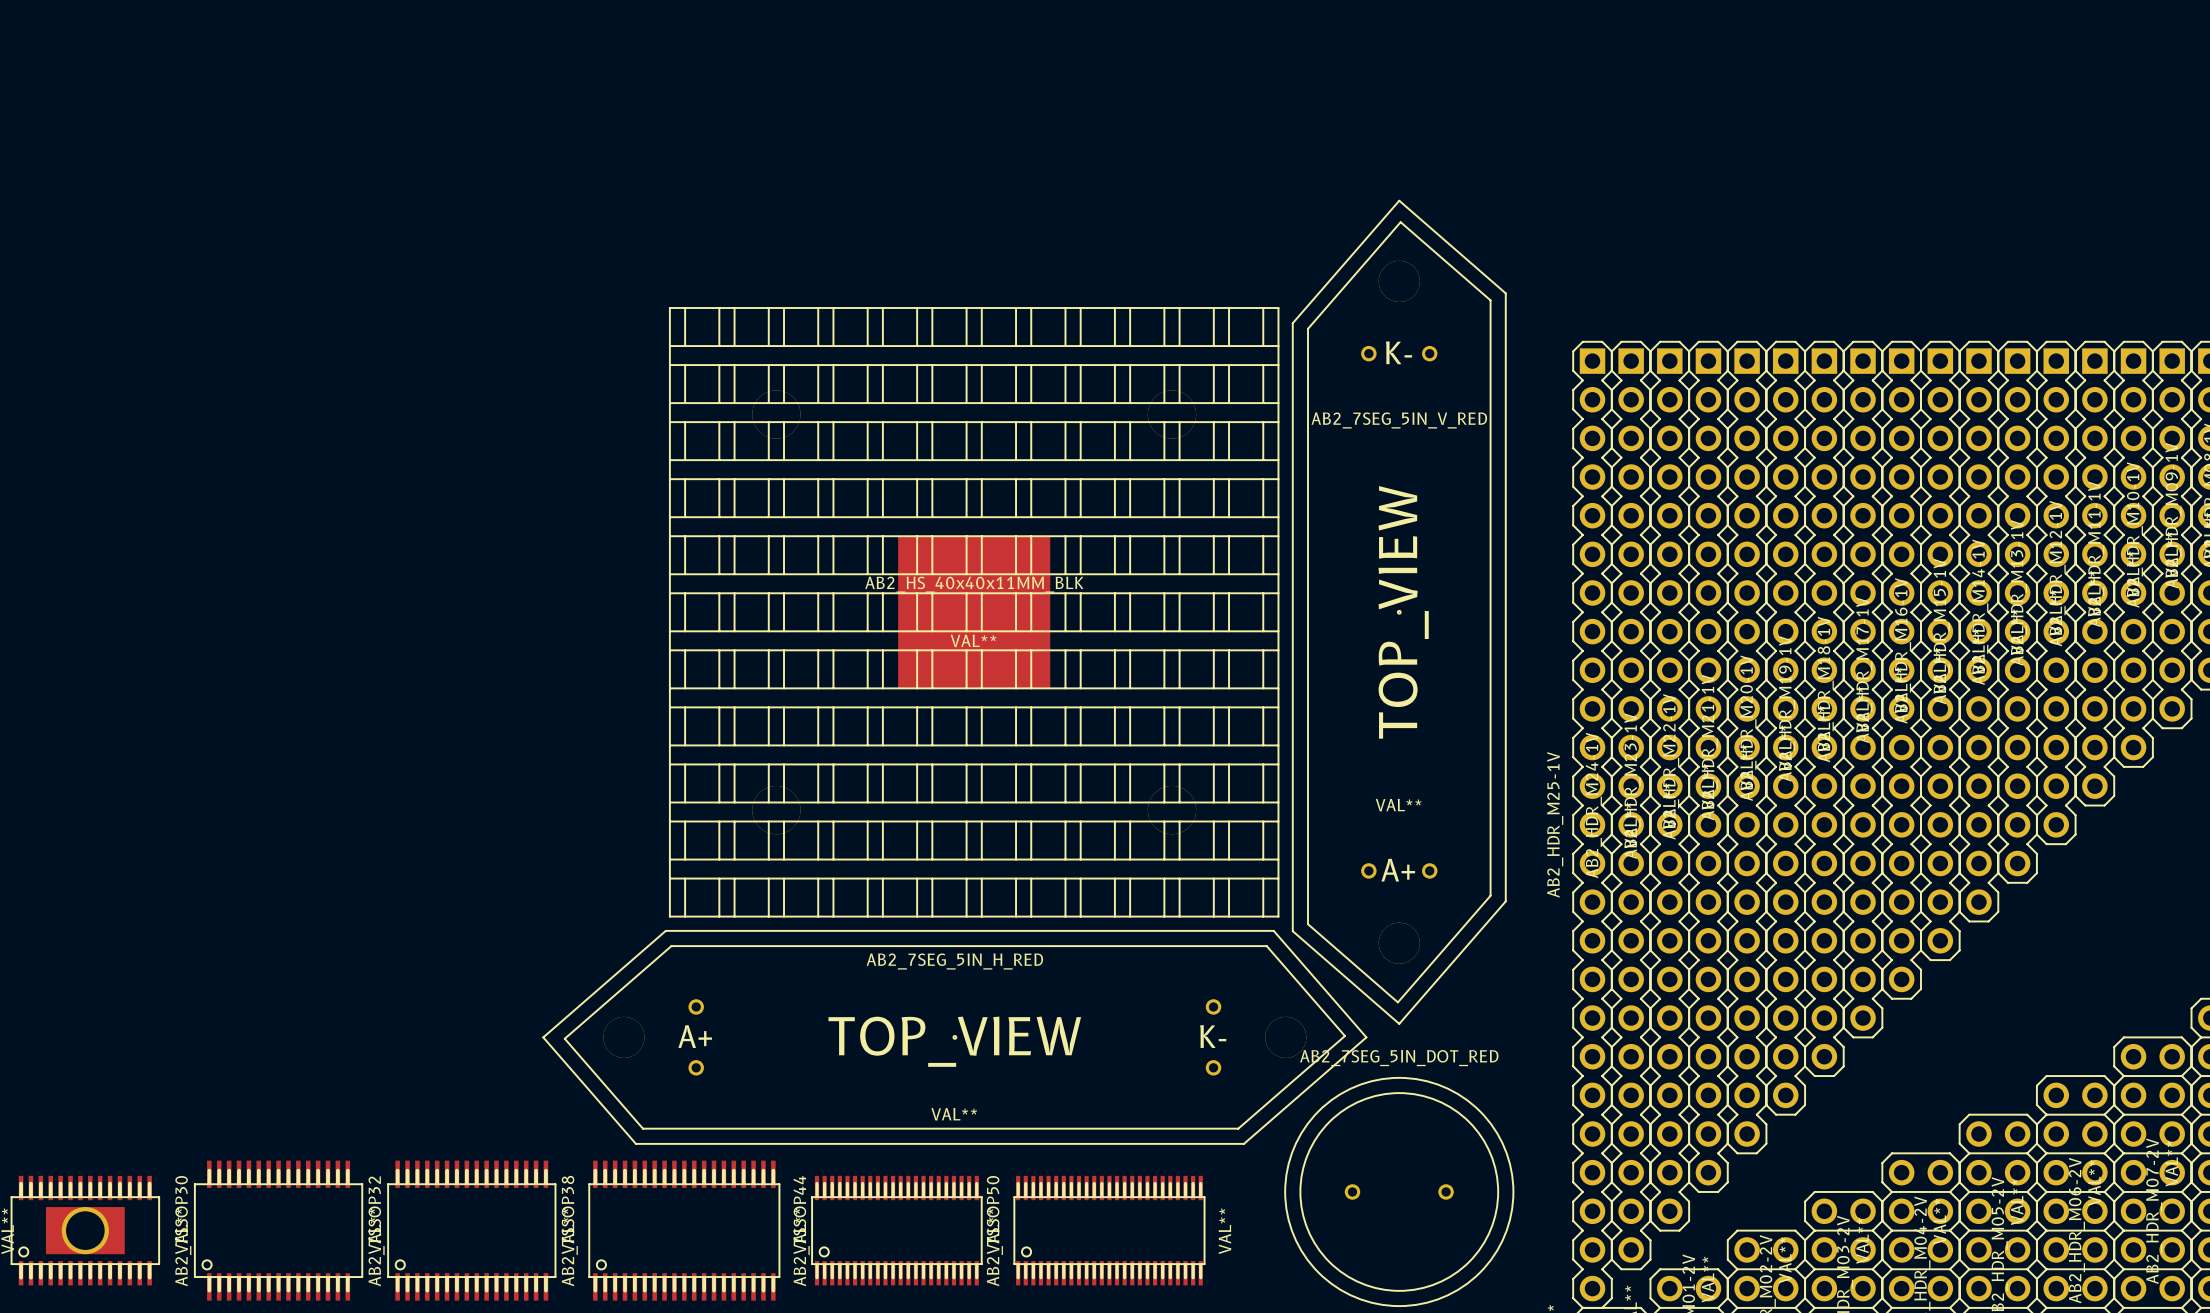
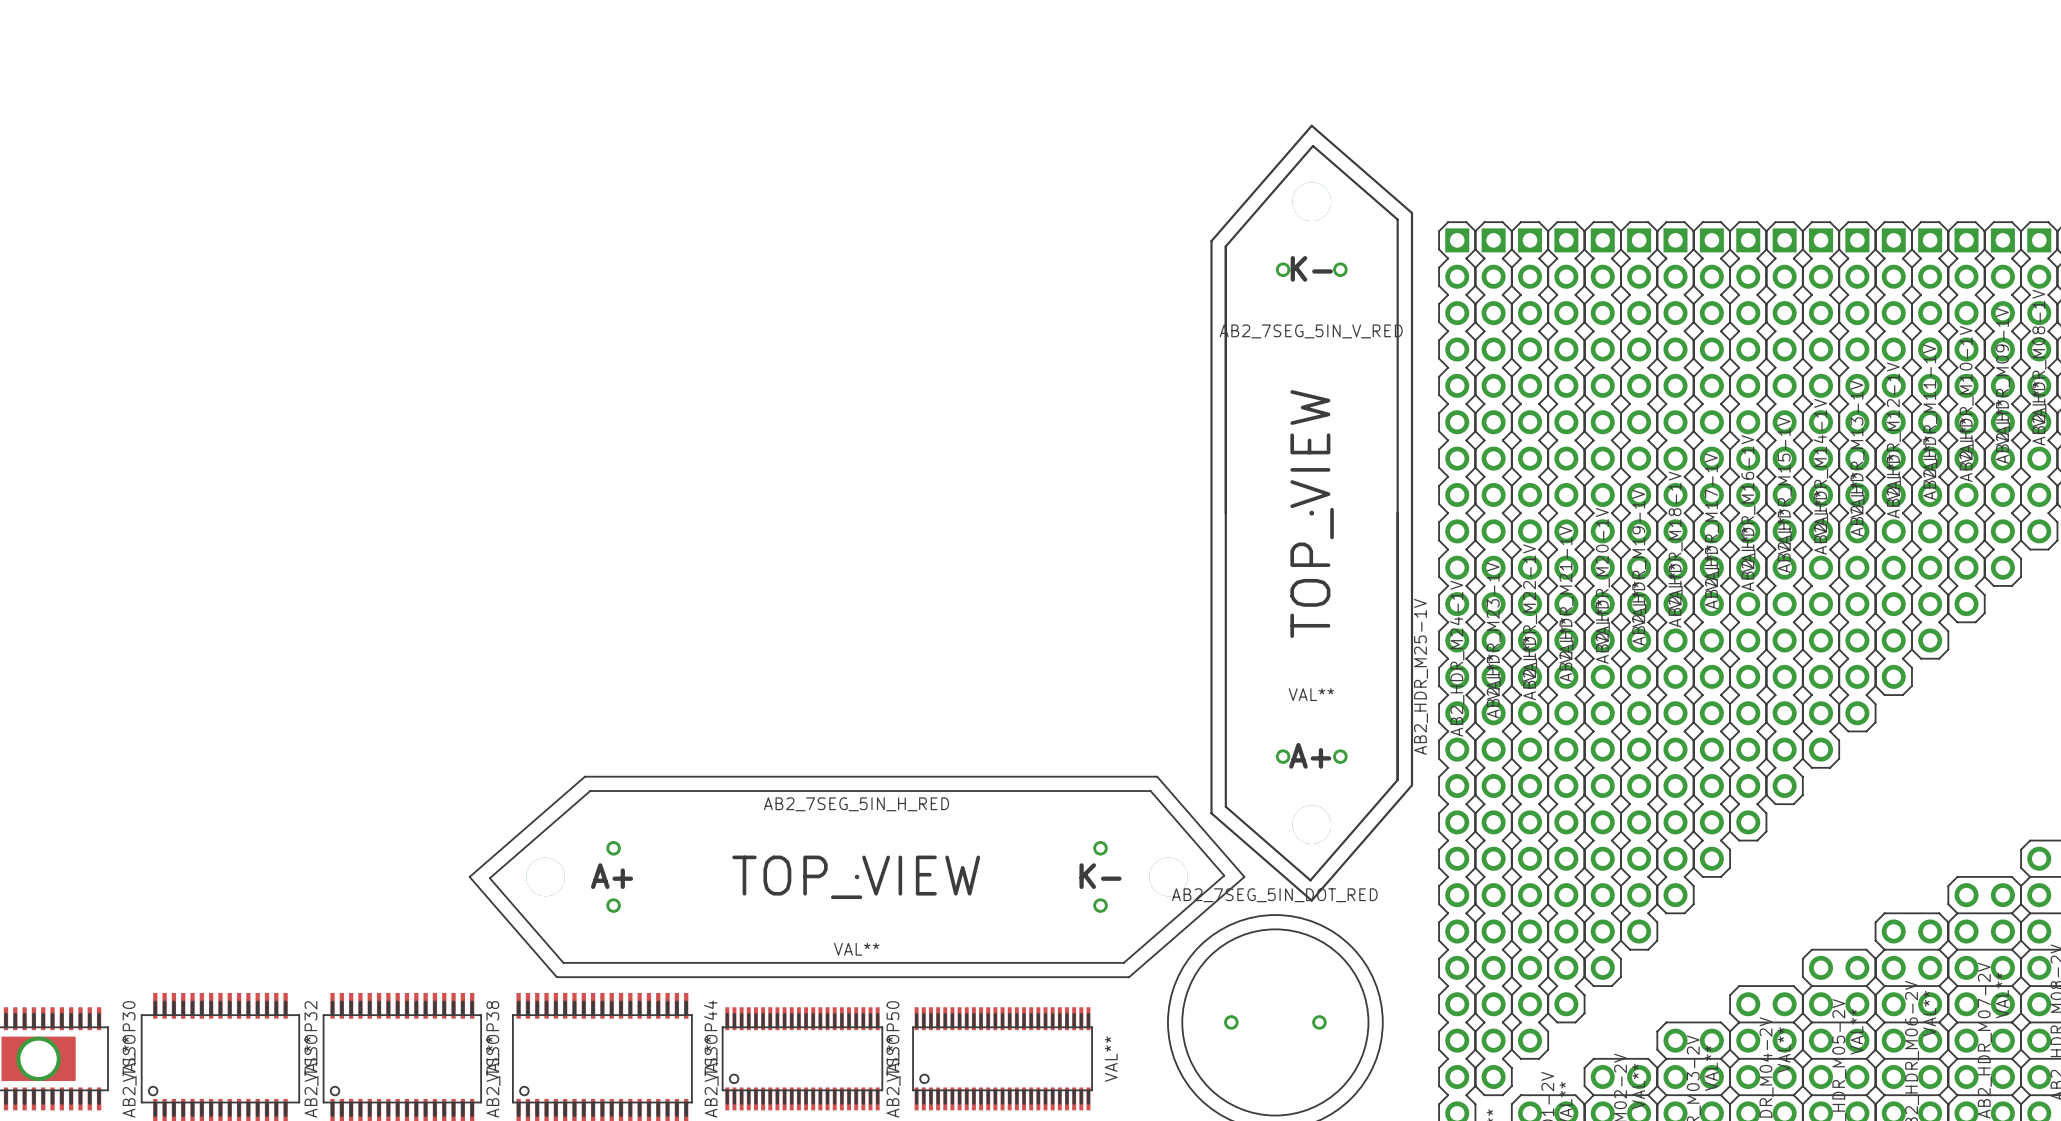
AB2_7SEG_5IN_V_RED footprint: [1291, 199, 1507, 1025] -> [1210, 124, 1414, 902]
AB2_HS_40x40x11MM_BLK: VAL** (974, 612) -> none

